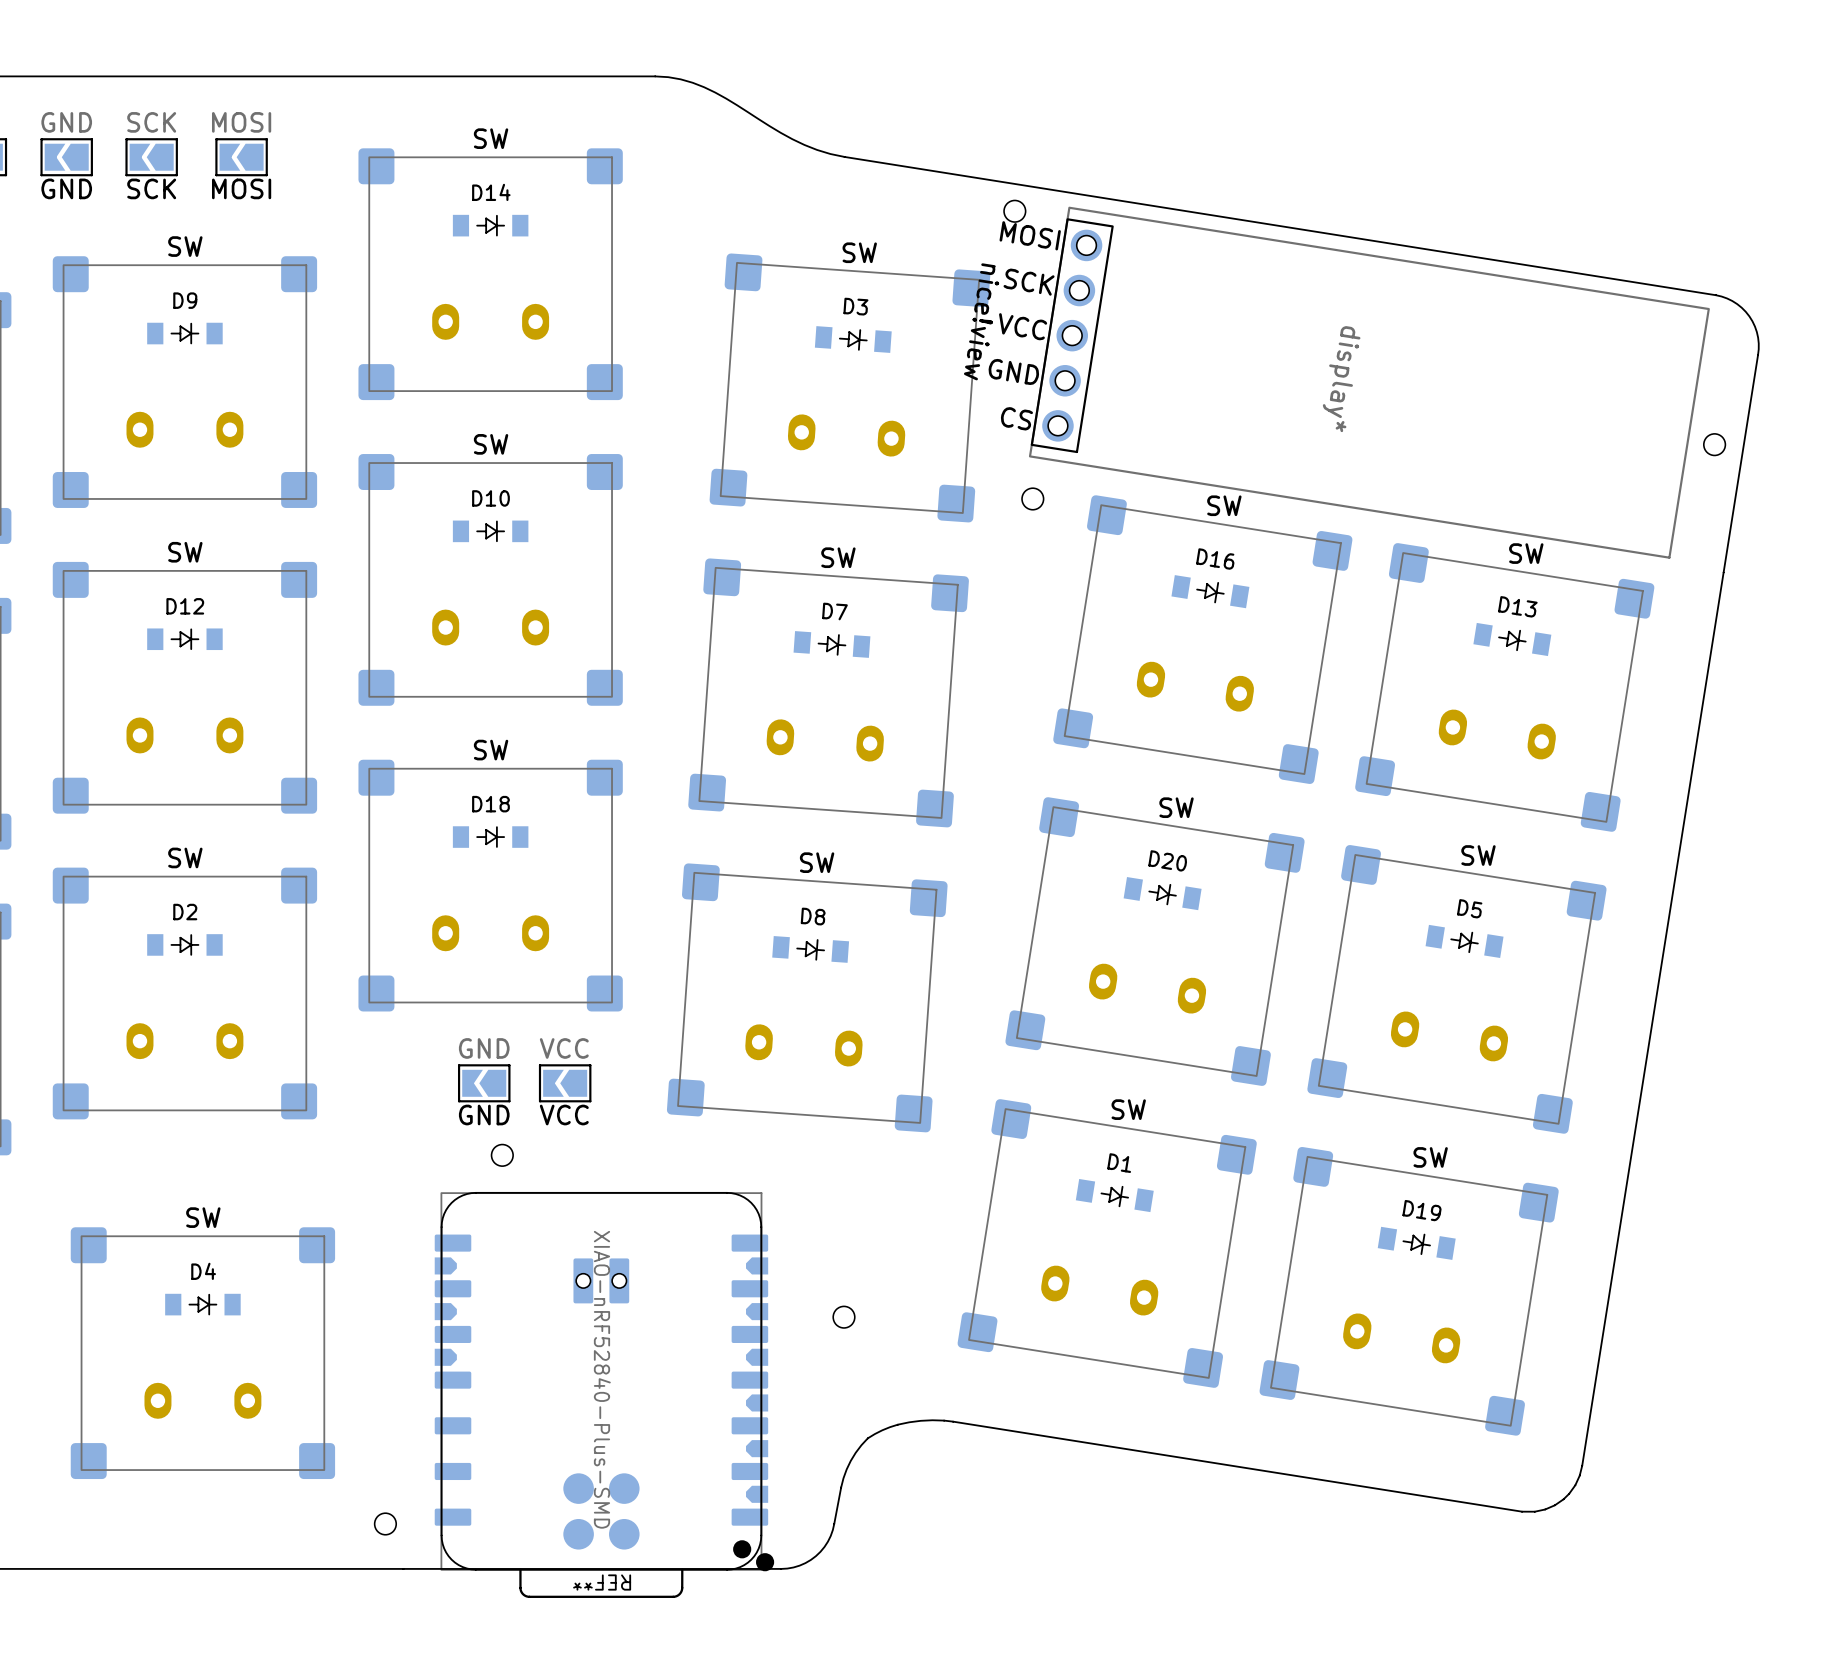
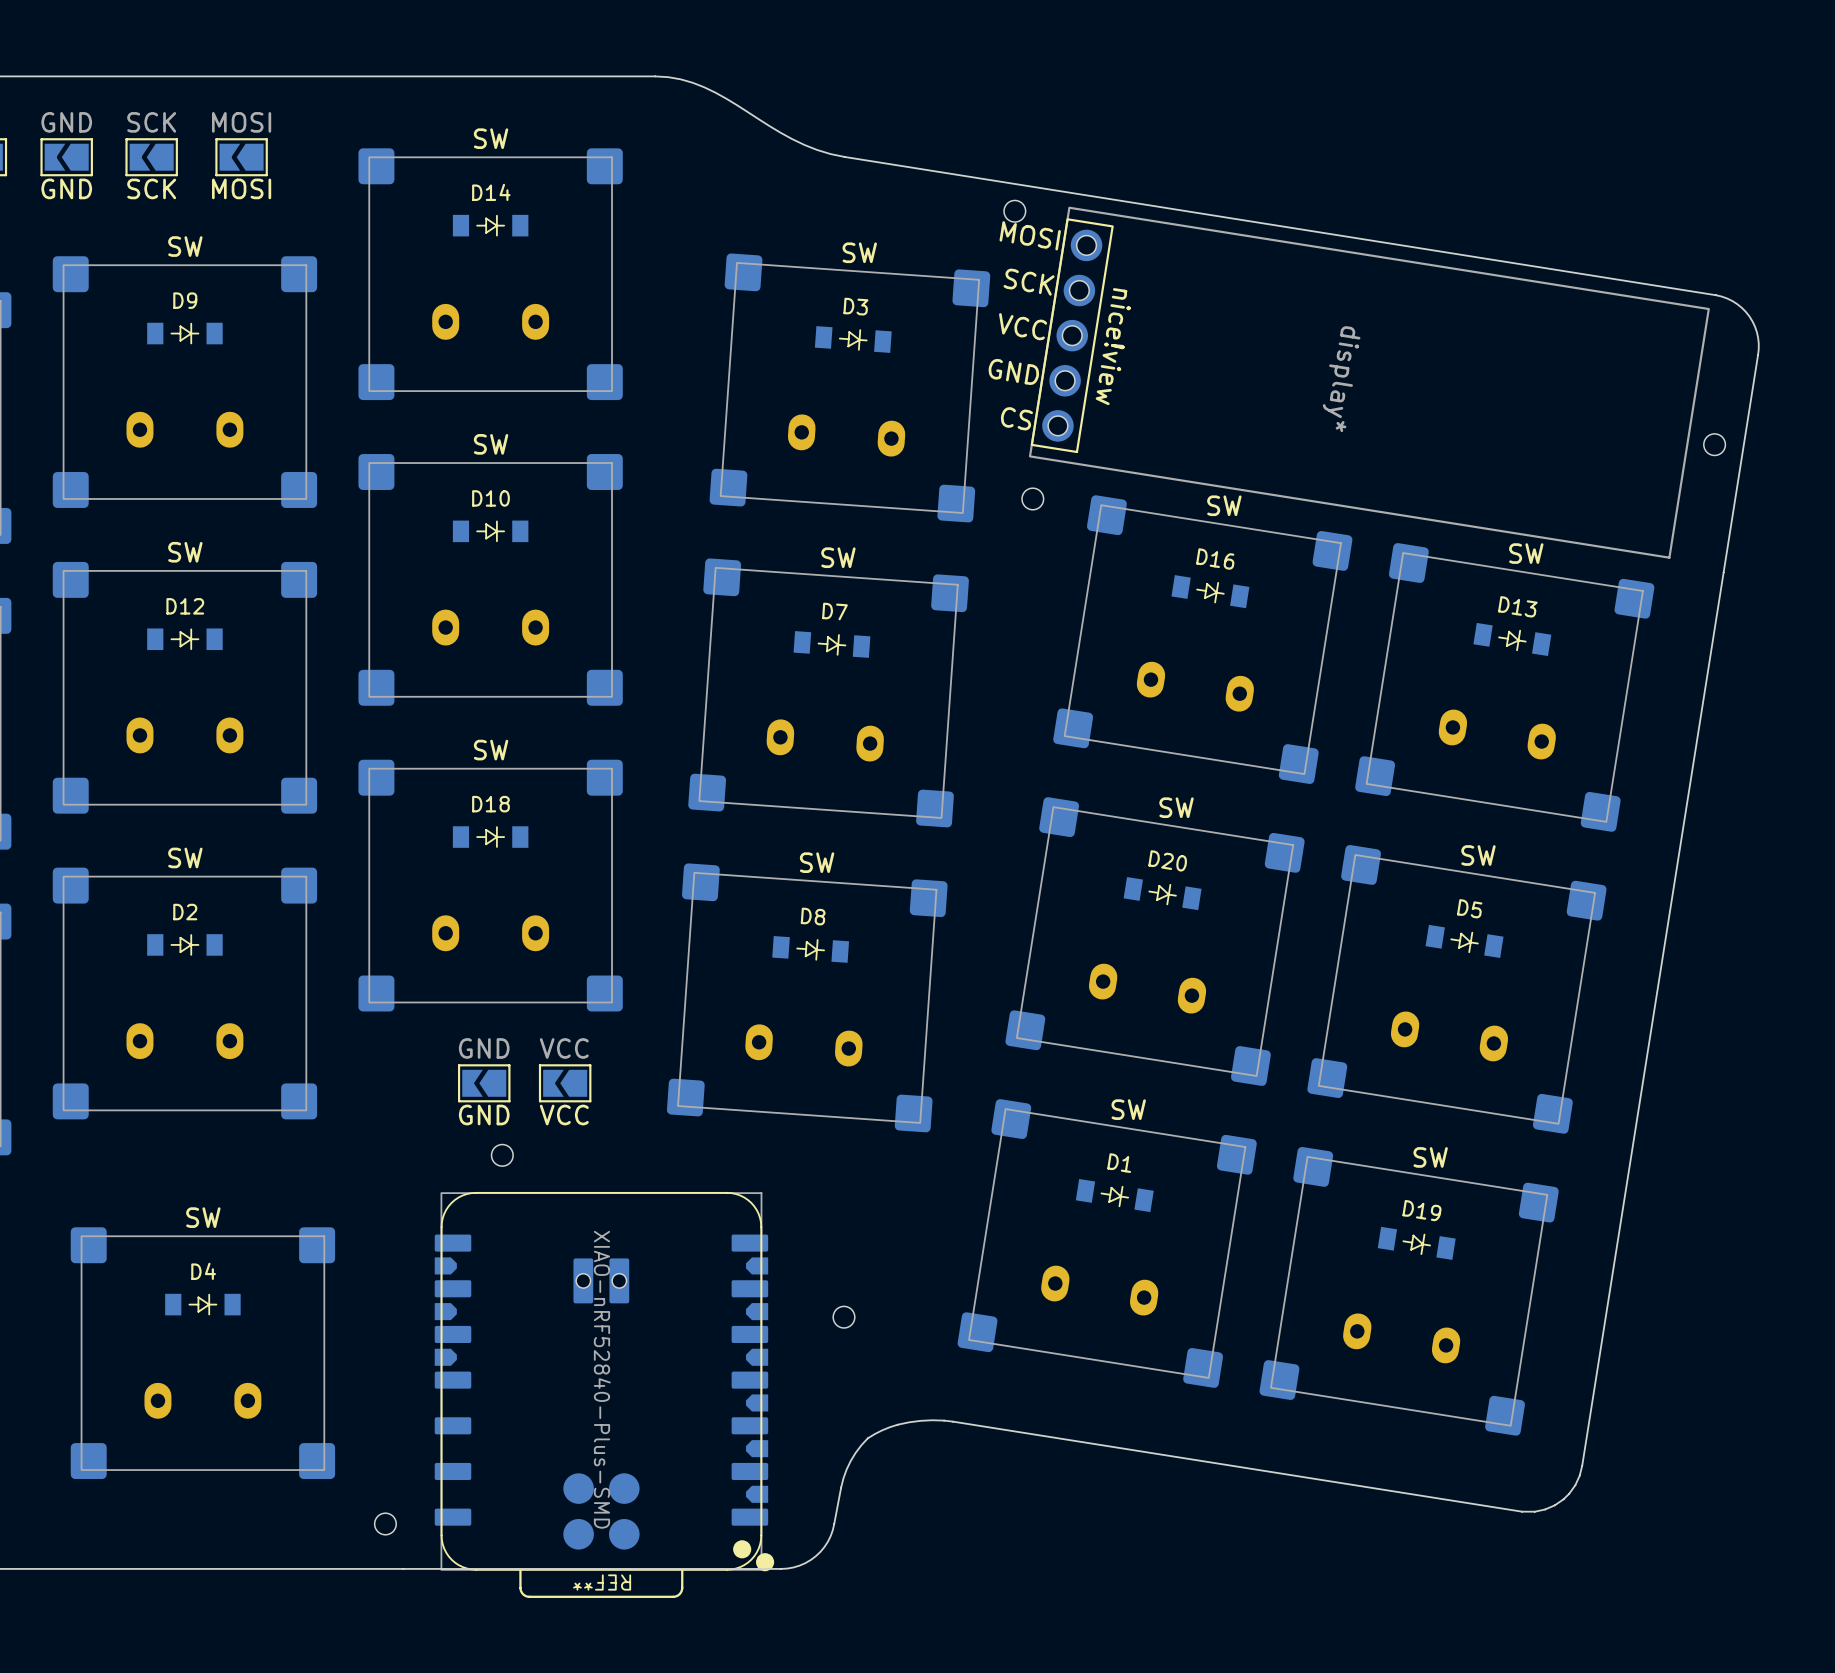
display* value position: nice!view (981, 321) -> nice!view (1113, 346)

